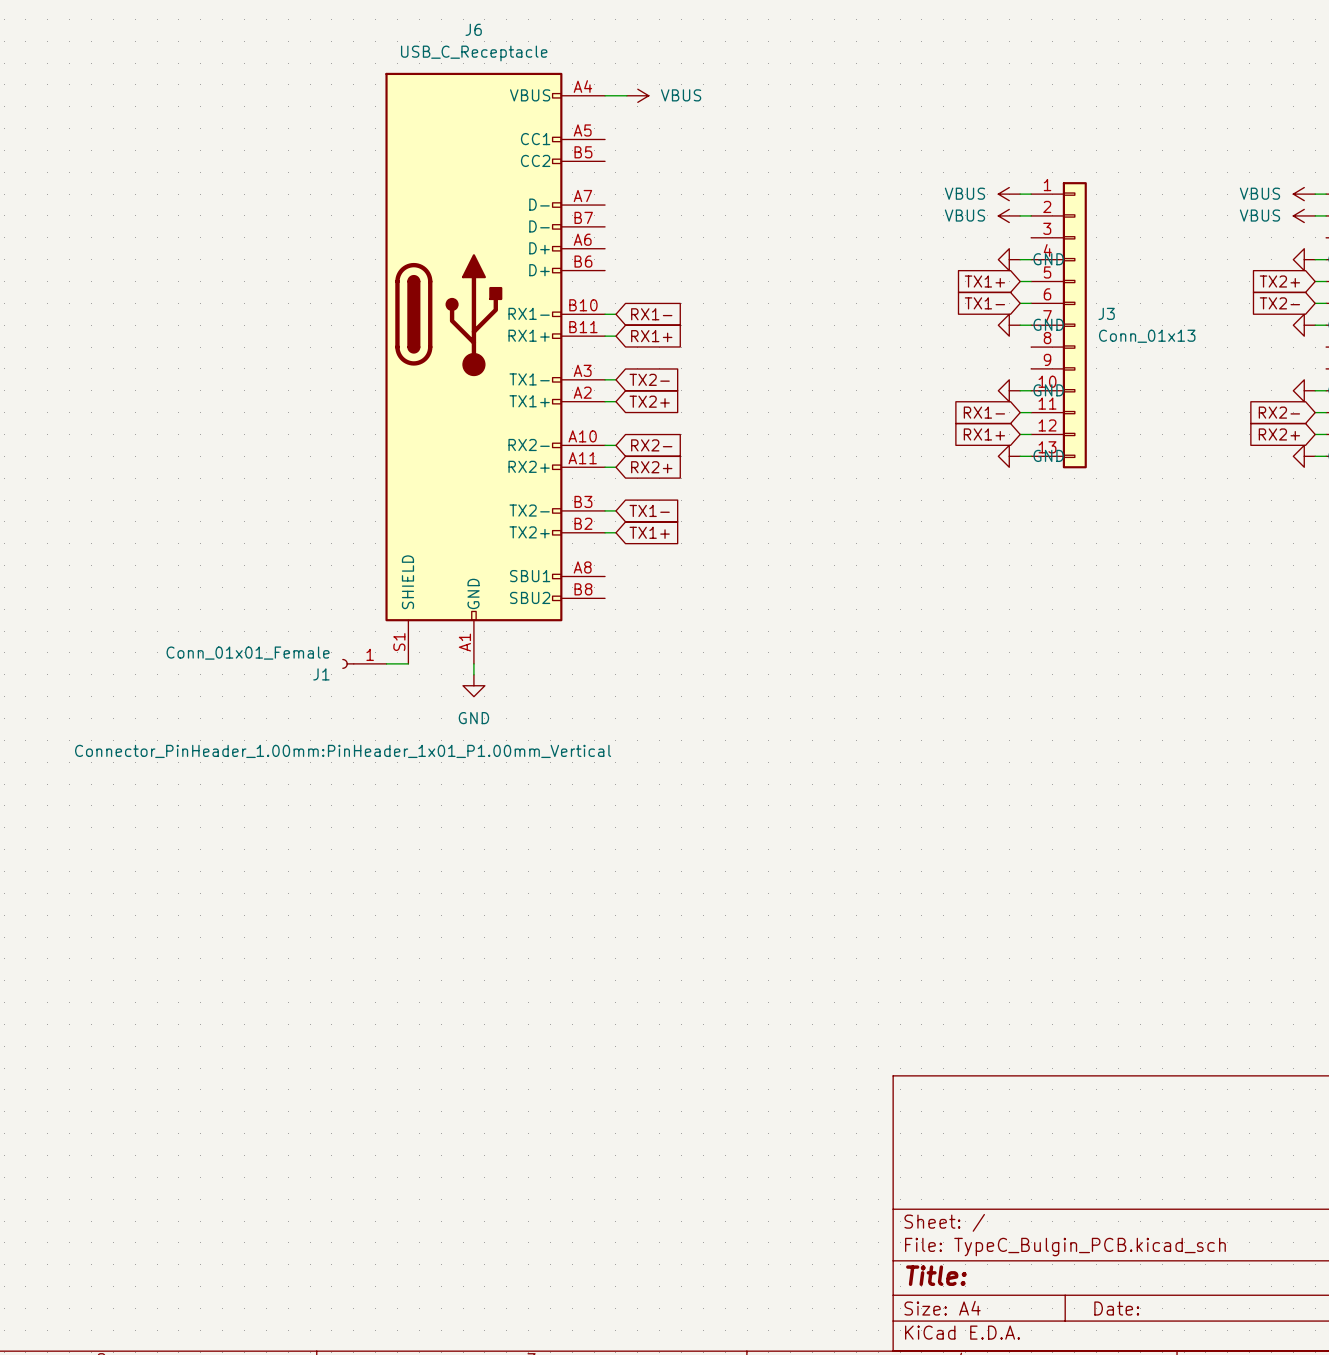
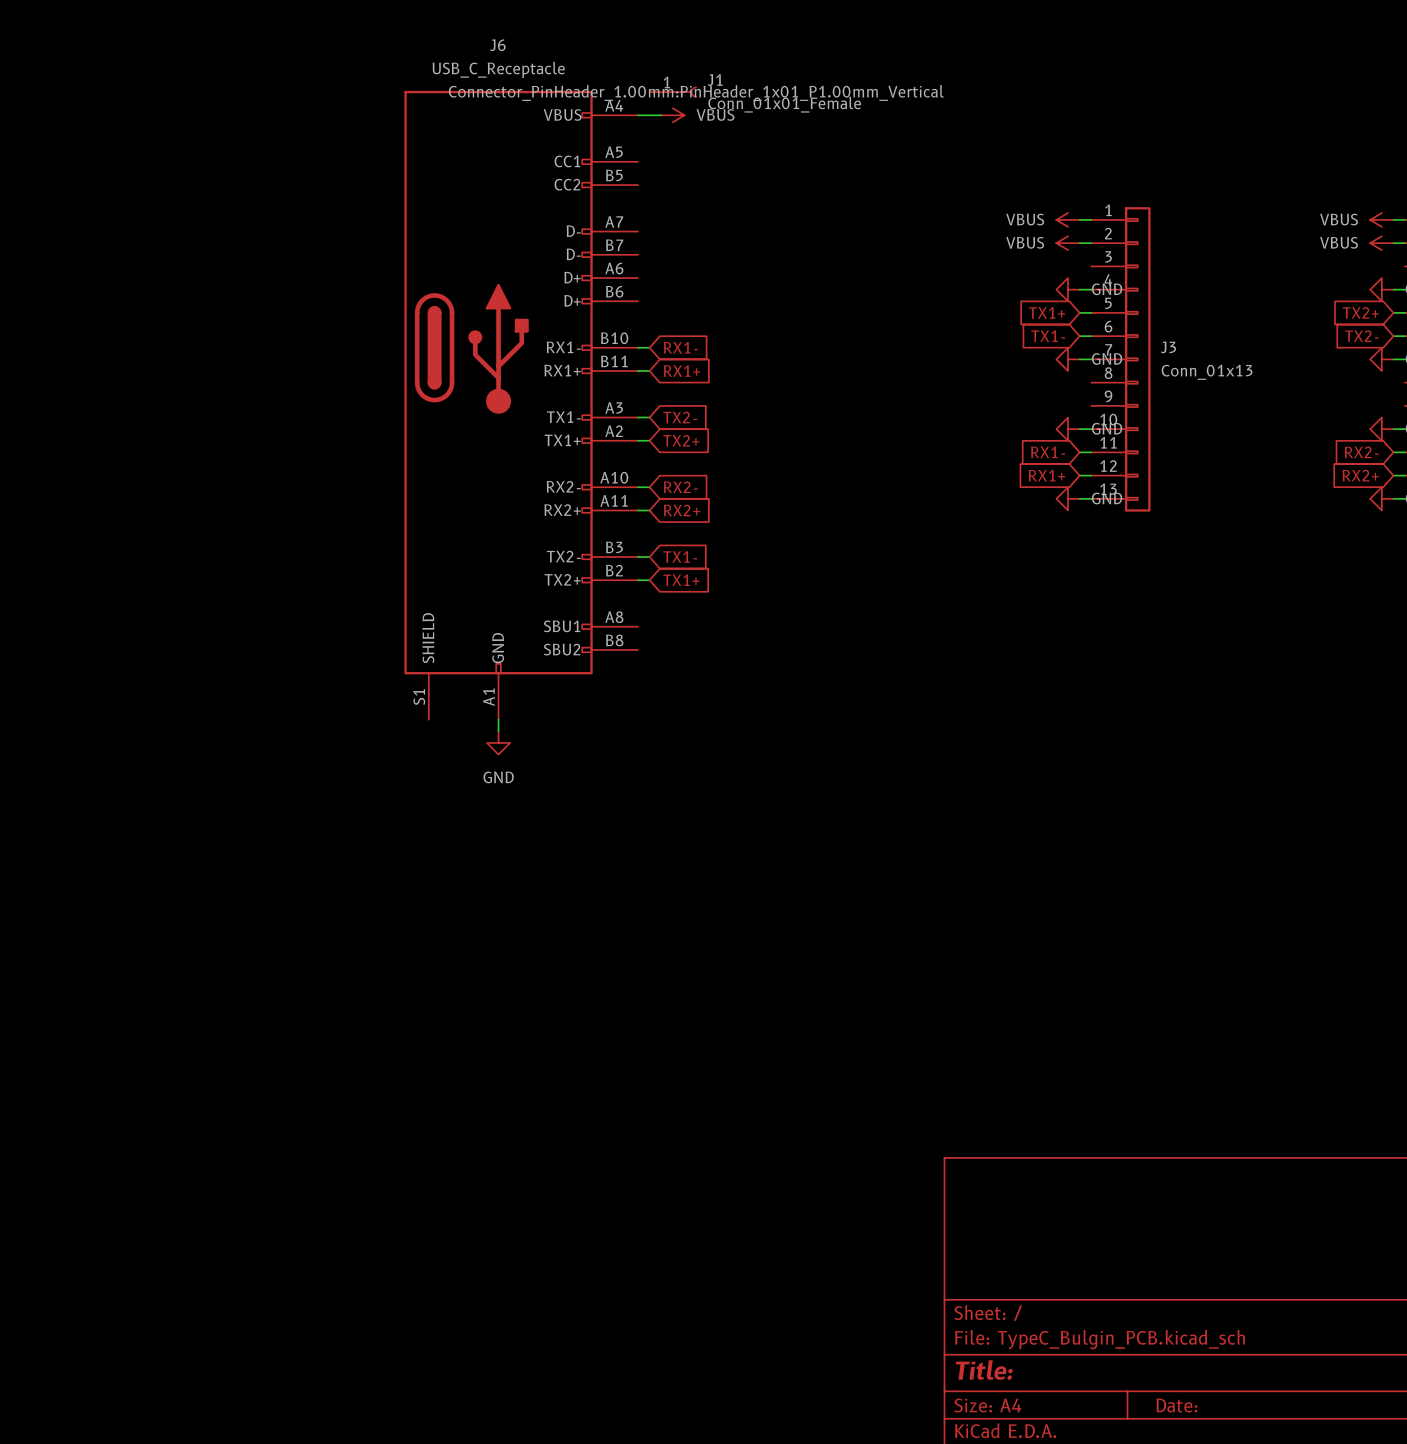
J1 rotation: 0° (348, 663) -> 180° (690, 92)
J1 position: (364, 663) -> (673, 92)
wire: (386, 663) (408, 663) -> none
J1 text position: Connector_PinHeader_1.00mm:PinHeader_1x01_P1.00mm_Vertical (343, 751) -> Connector_PinHeader_1.00mm:PinHeader_1x01_P1.00mm_Vertical (696, 93)

